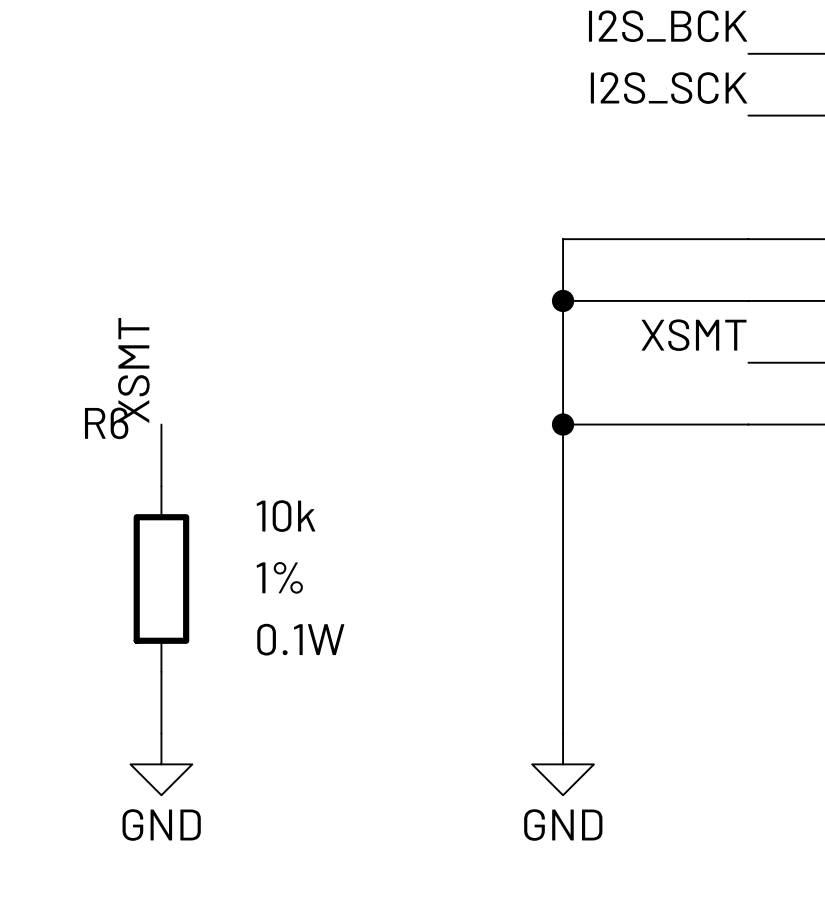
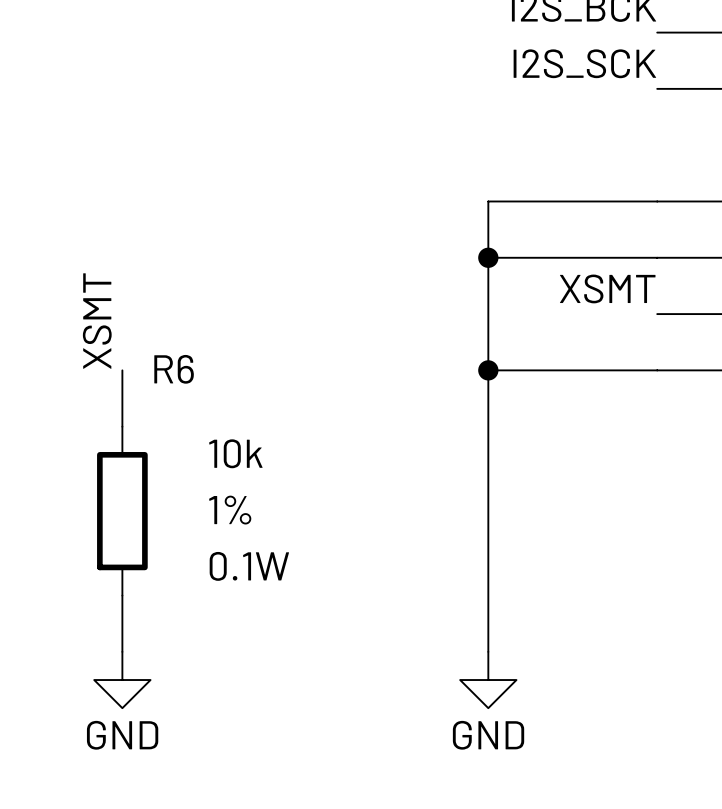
R6 name position: R6 (106, 423) -> R6 (174, 369)

